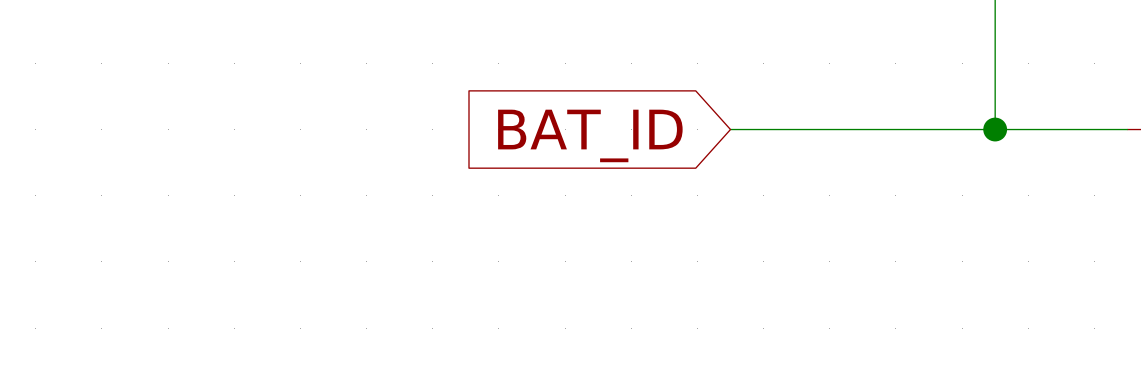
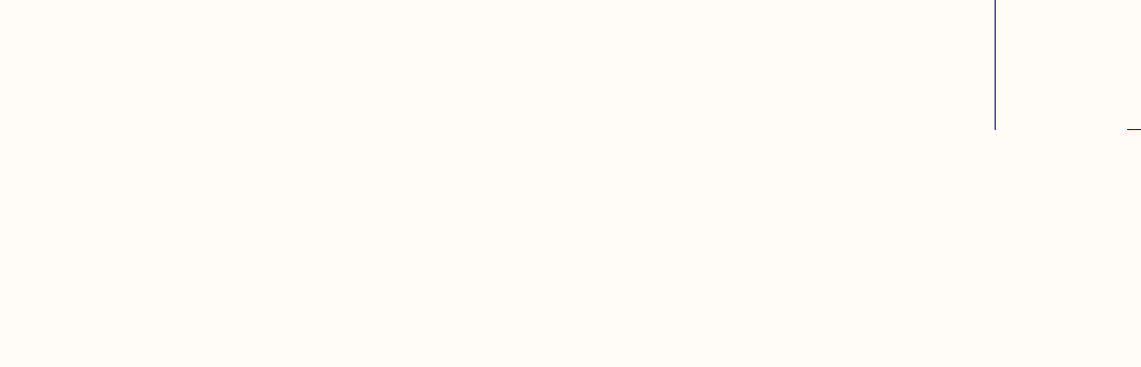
wire: (730, 129) (1127, 129) -> none
junction: (995, 129) -> none
global label: BAT_ID (590, 135) -> none

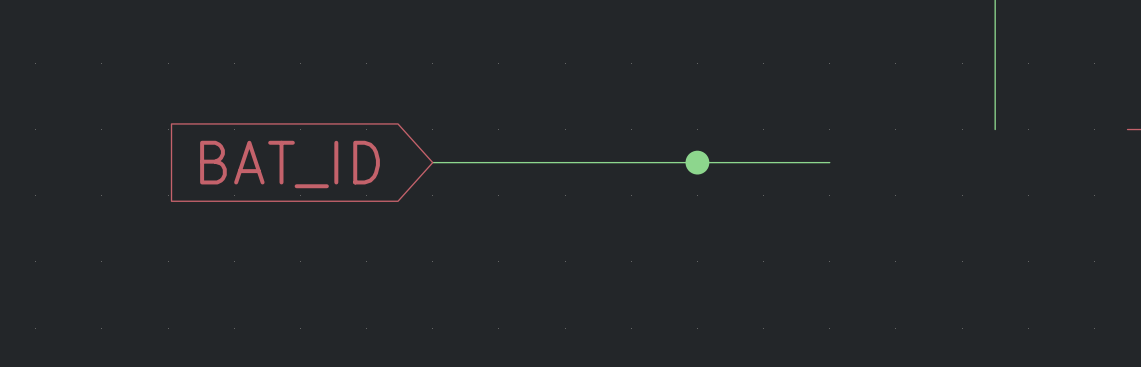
wire: none -> (432, 162) (829, 162)
junction: none -> (697, 162)
global label: none -> BAT_ID (290, 164)

